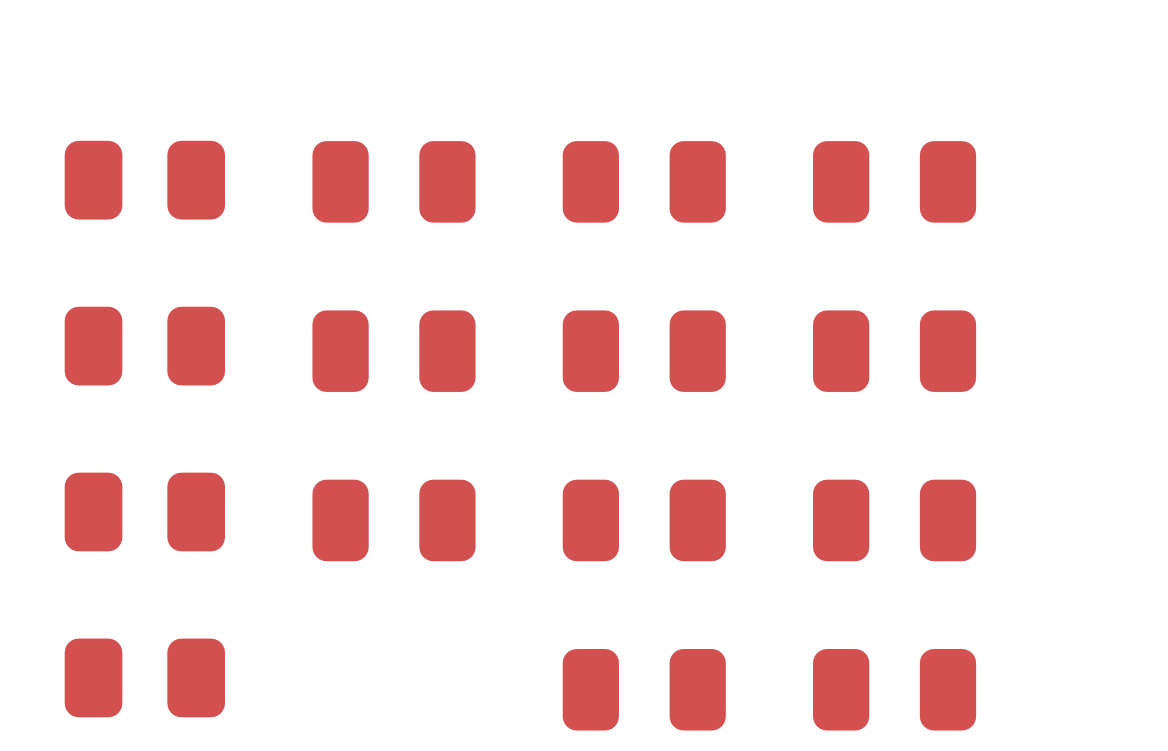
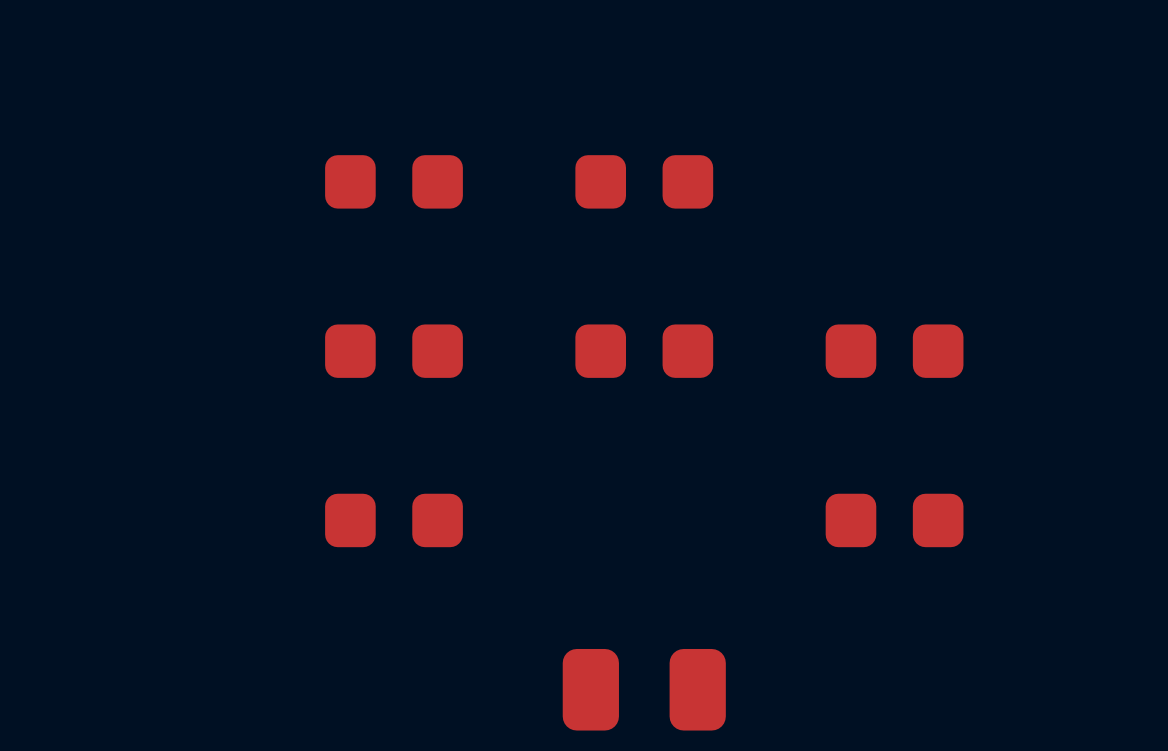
part footprint: [312, 141, 476, 223] -> [325, 155, 463, 209]
part footprint: [562, 141, 726, 223] -> [575, 155, 714, 209]
part: (144, 180) -> none
part: (894, 181) -> none
part footprint: [312, 310, 476, 392] -> [325, 324, 463, 378]
part footprint: [562, 310, 726, 392] -> [575, 324, 714, 378]
part footprint: [813, 310, 977, 392] -> [825, 324, 964, 378]
part: (144, 346) -> none
part footprint: [312, 479, 476, 562] -> [325, 493, 463, 548]
part footprint: [813, 479, 977, 562] -> [825, 493, 964, 548]
part: (144, 512) -> none
part: (644, 520) -> none
part: (144, 677) -> none
part: (894, 689) -> none

